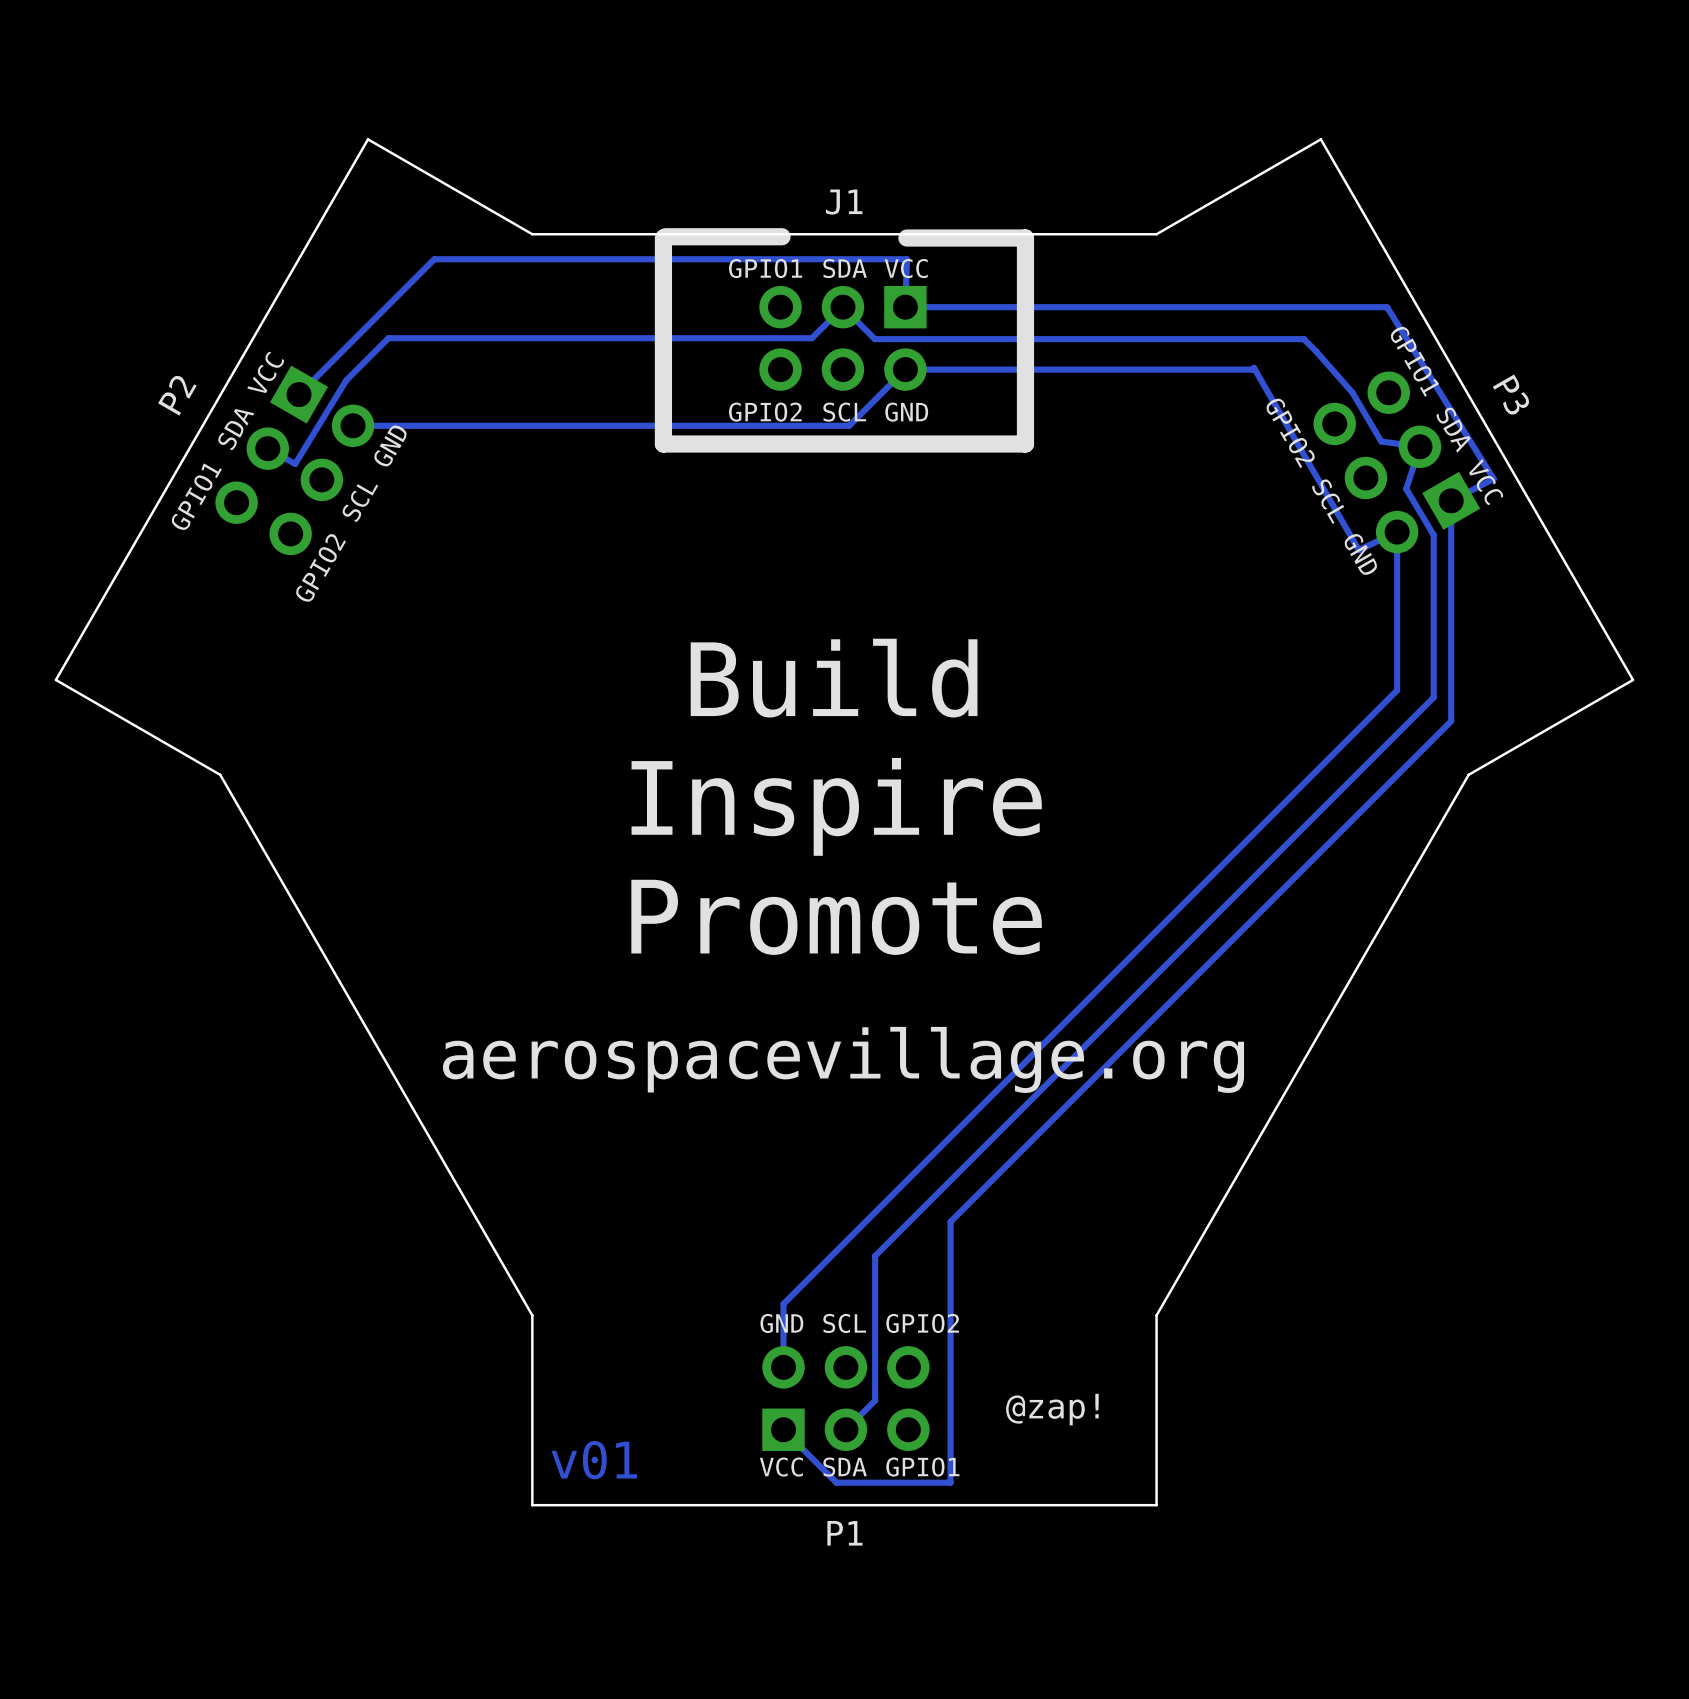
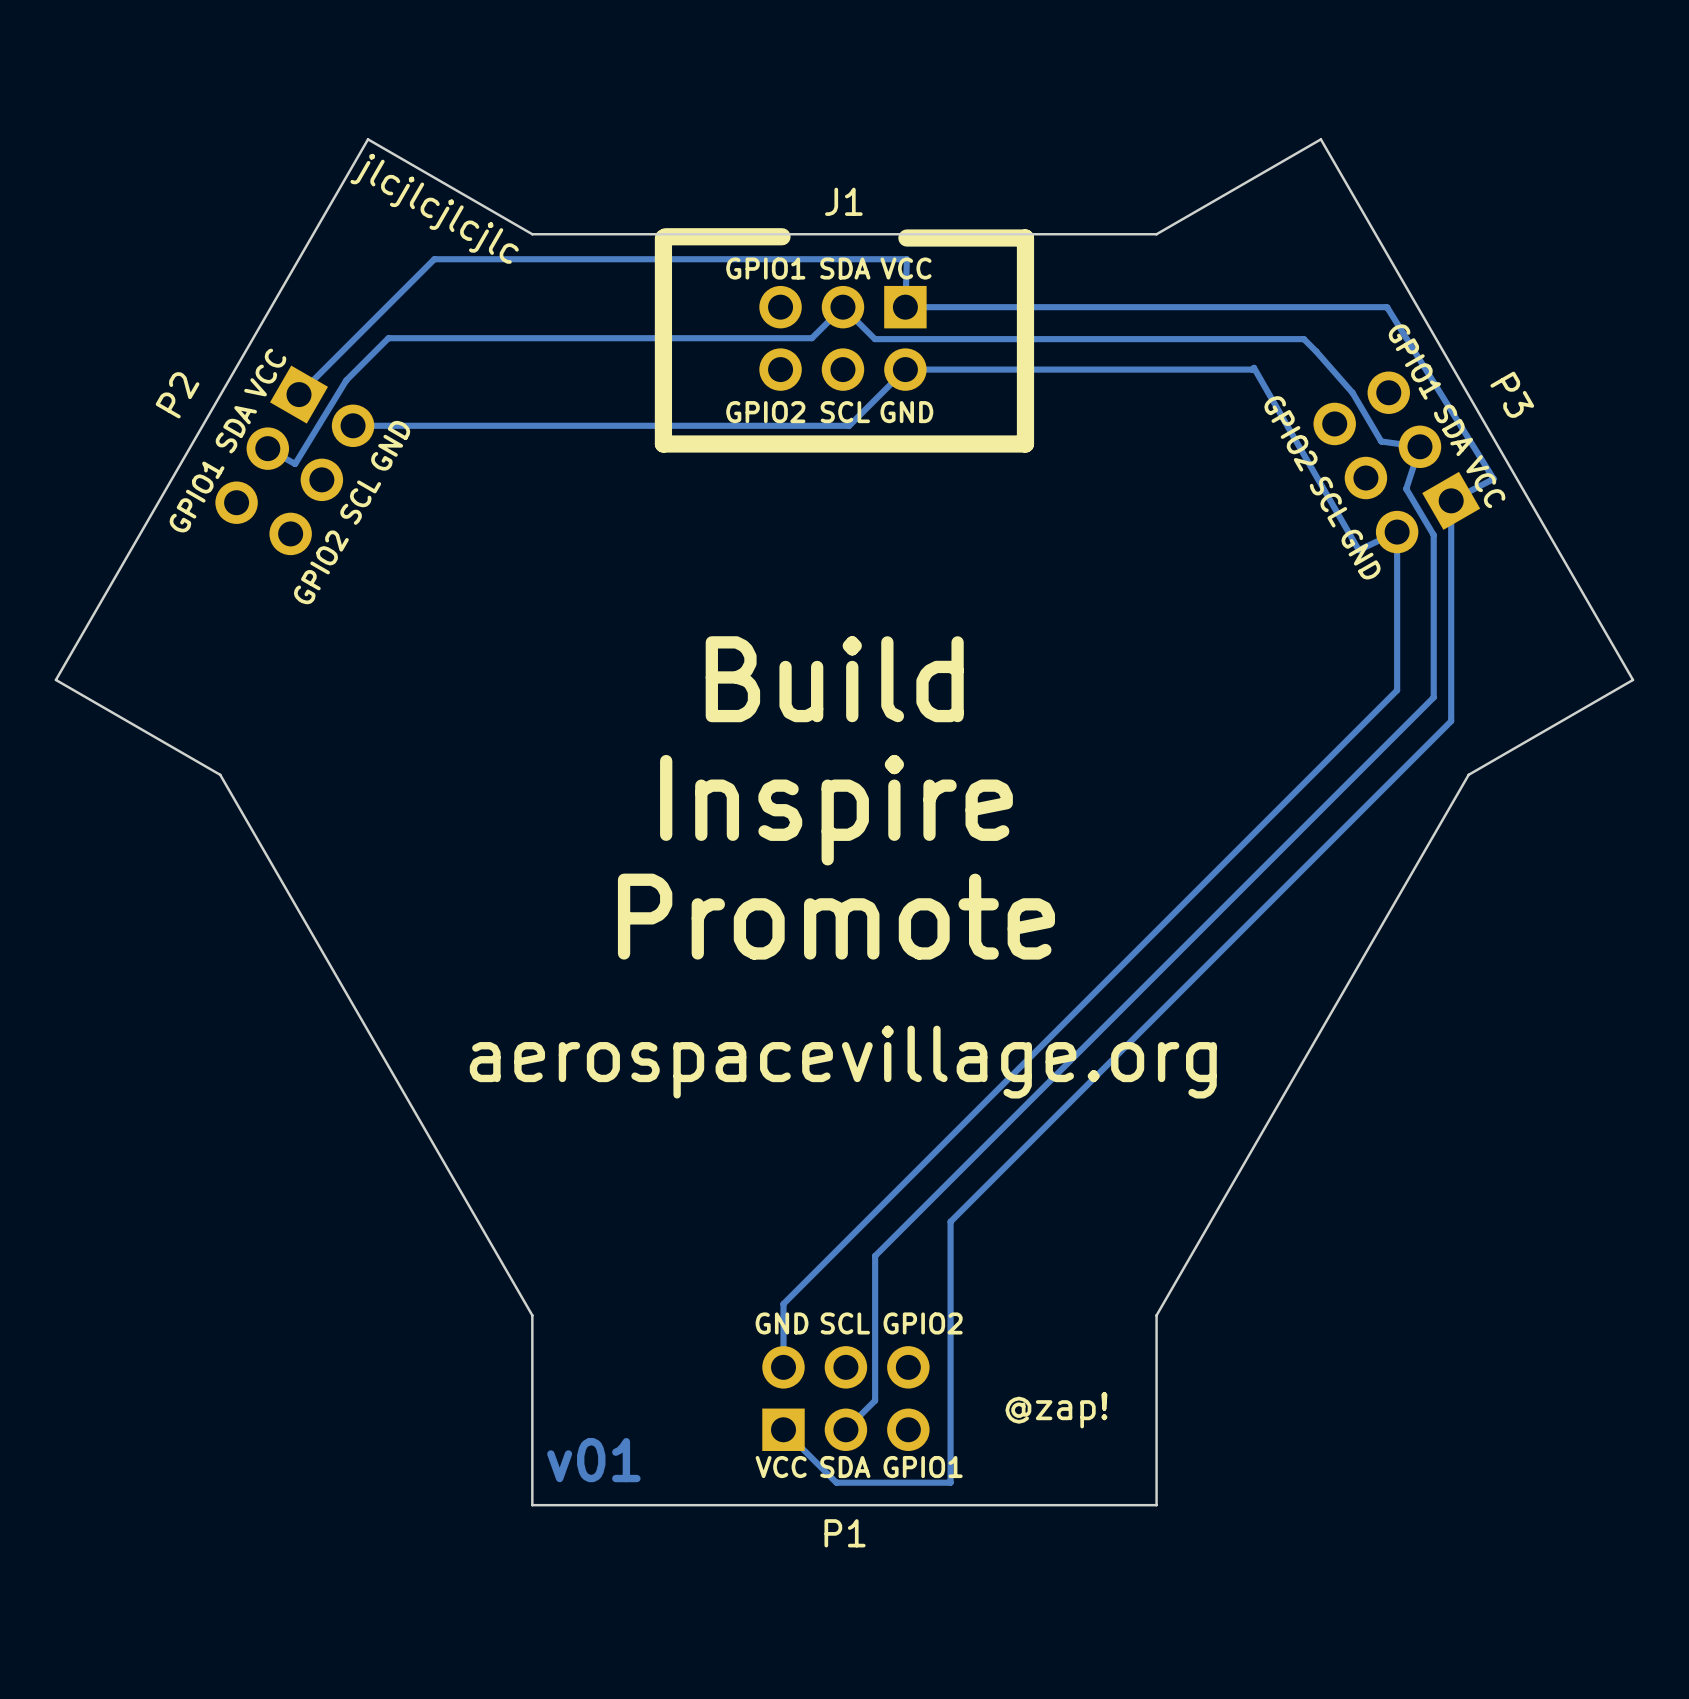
text: none -> jlcjlcjlcjlc (434, 208)

